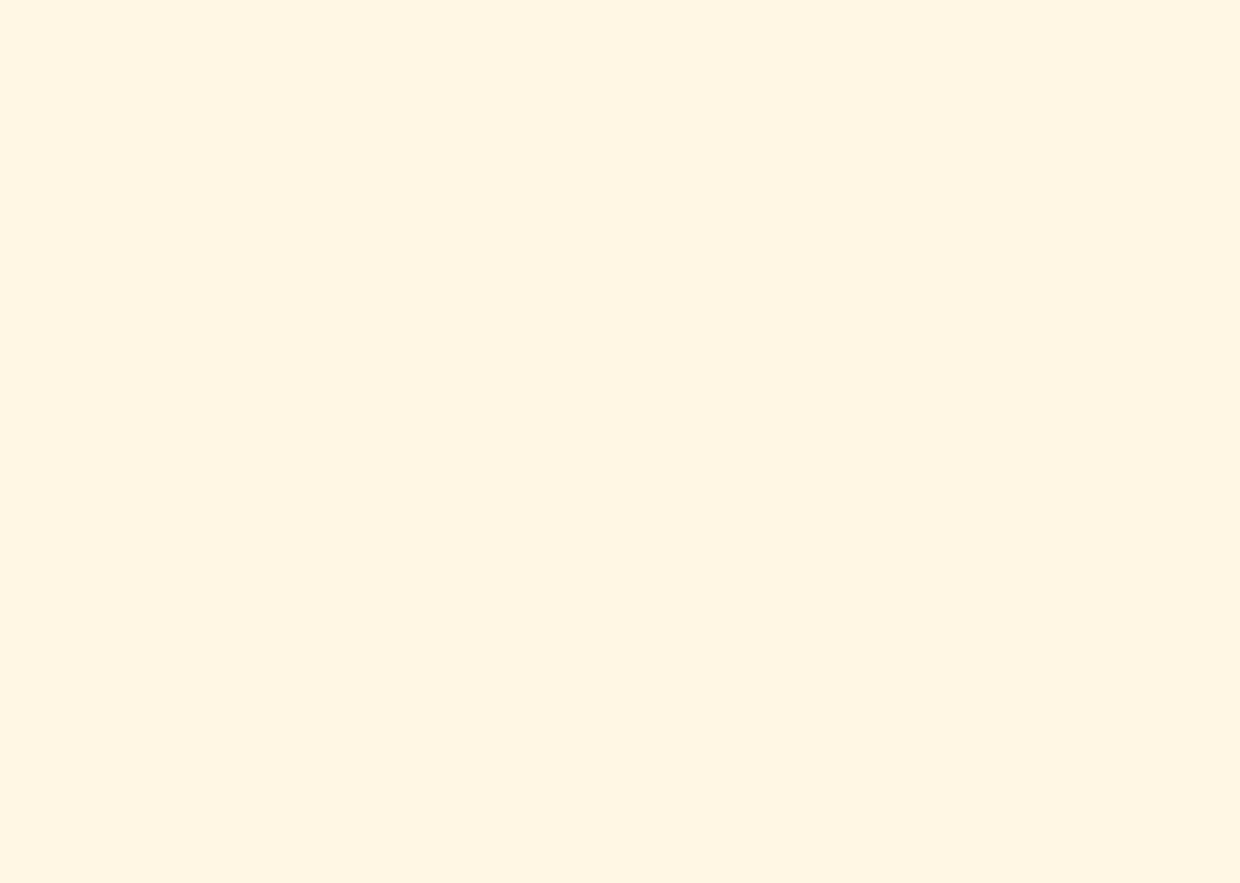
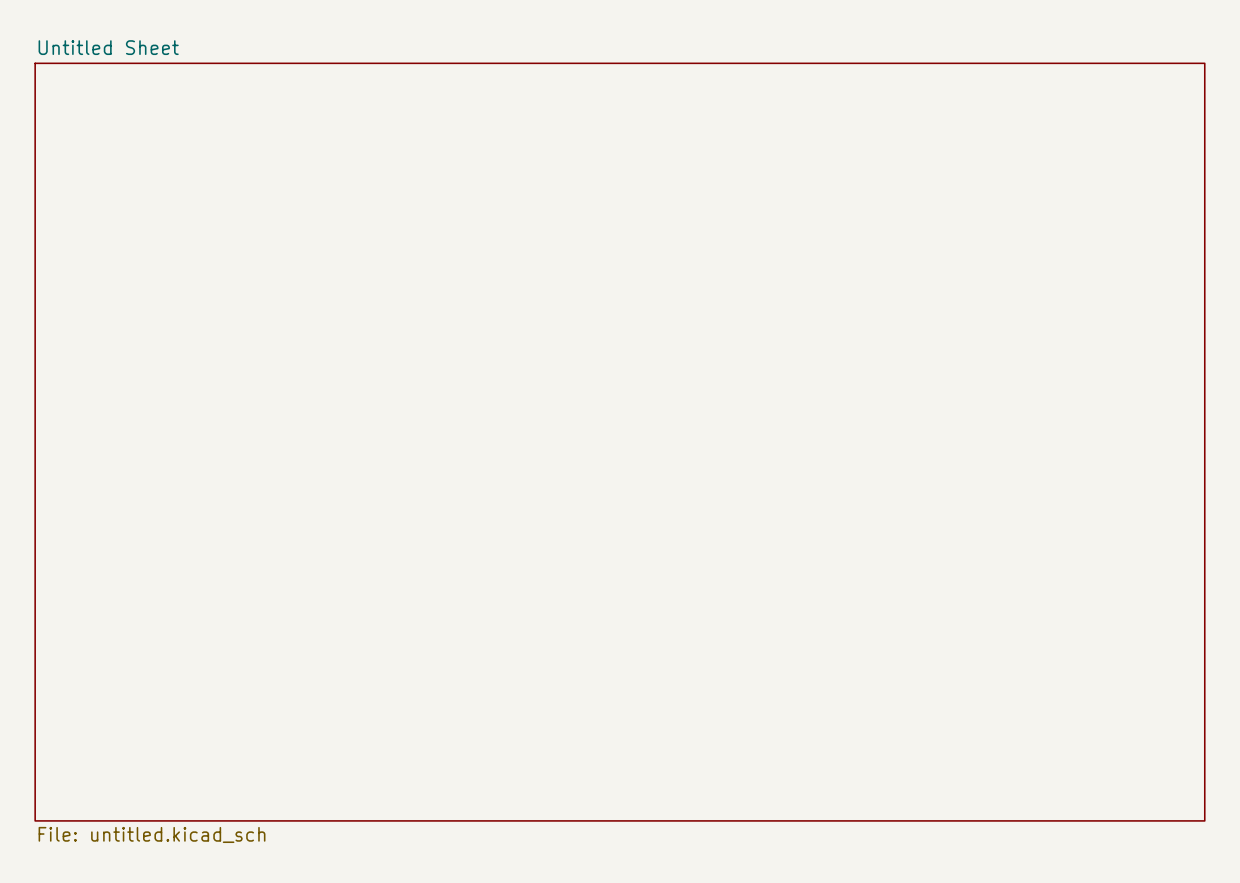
sheet Untitled Sheet: none -> File: untitled.kicad_sch (619, 442)

